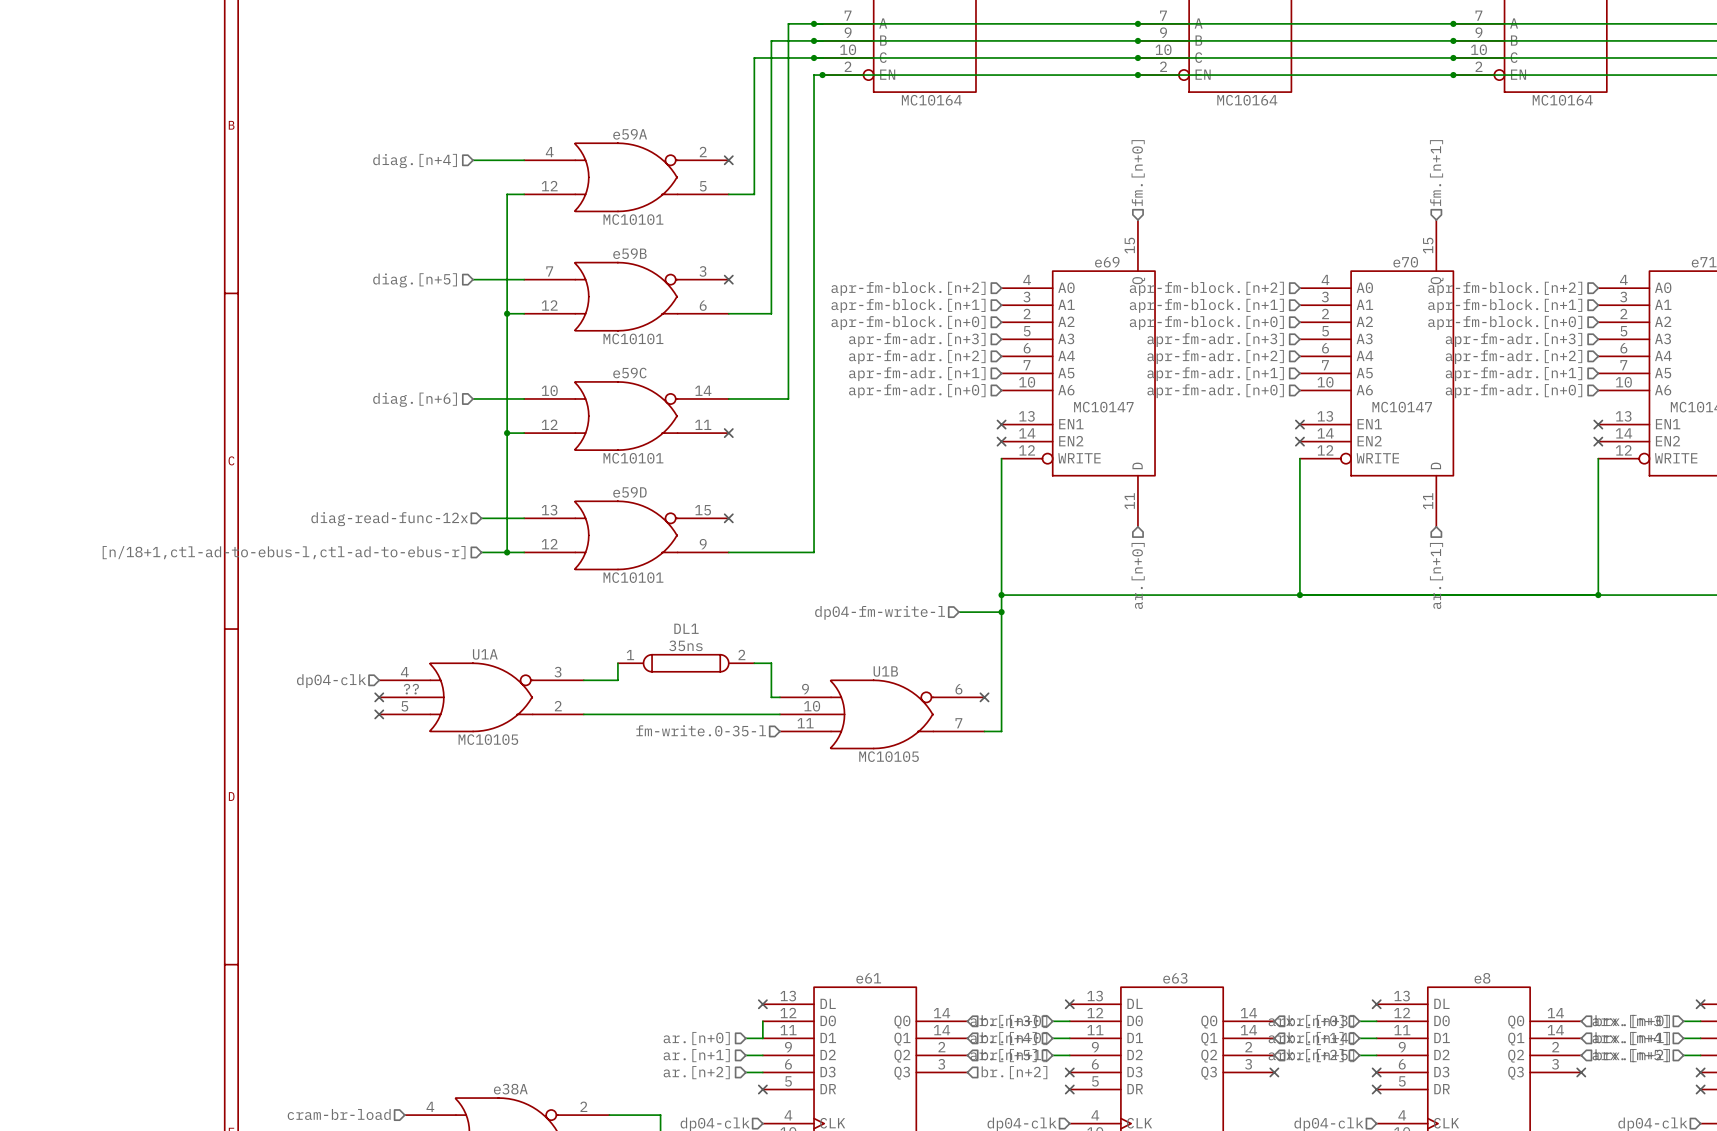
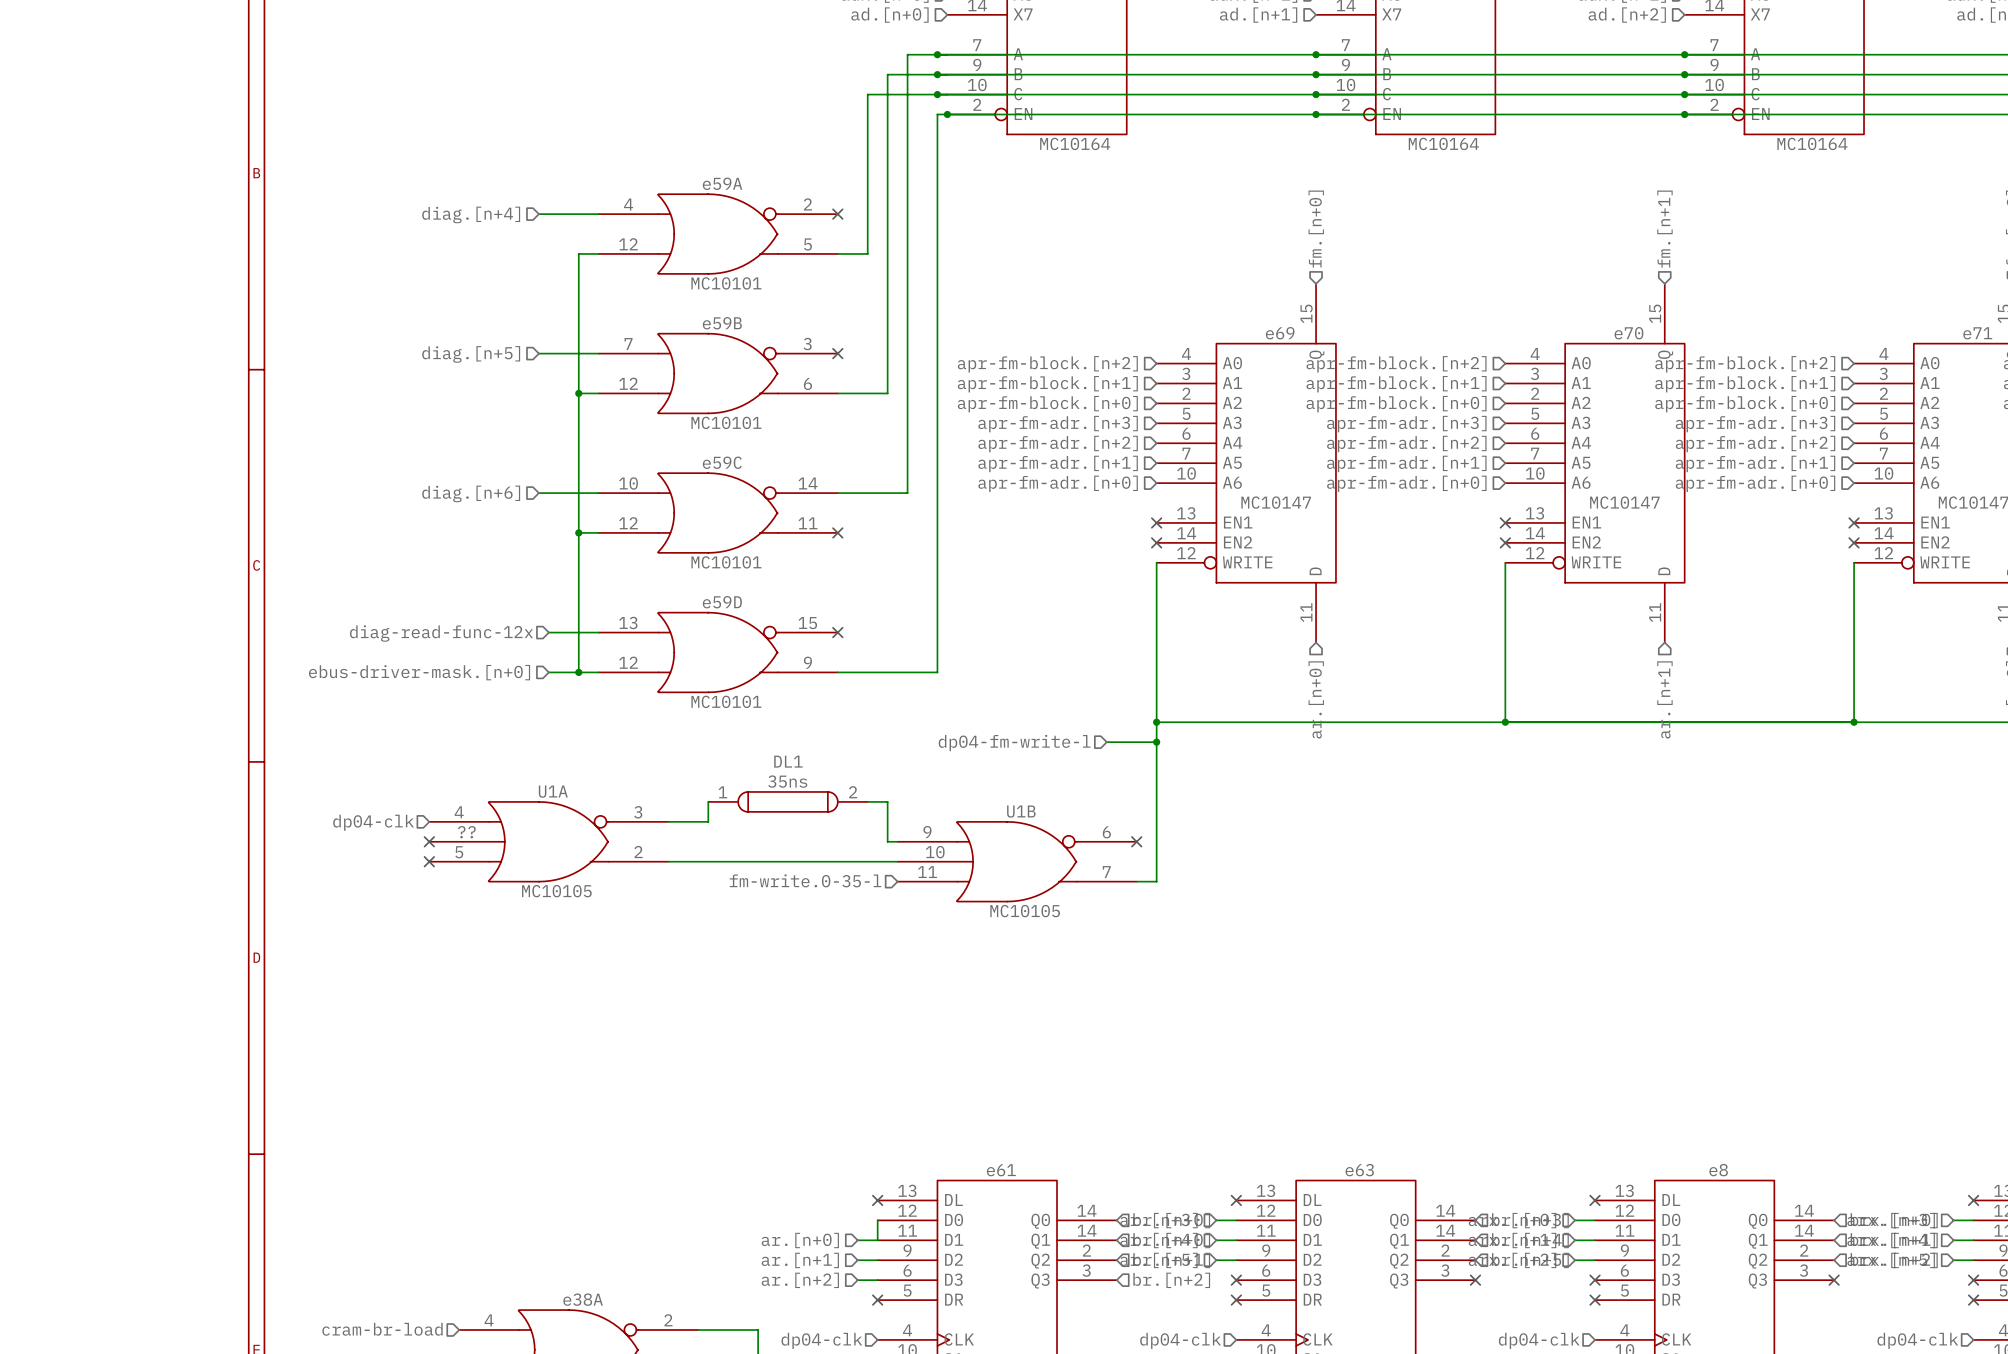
hierarchical label: [n/18+1,ctl-ad-to-ebus-l,ctl-ad-to-ebus-r] (284, 552) -> ebus-driver-mask.[n+0] (419, 672)

